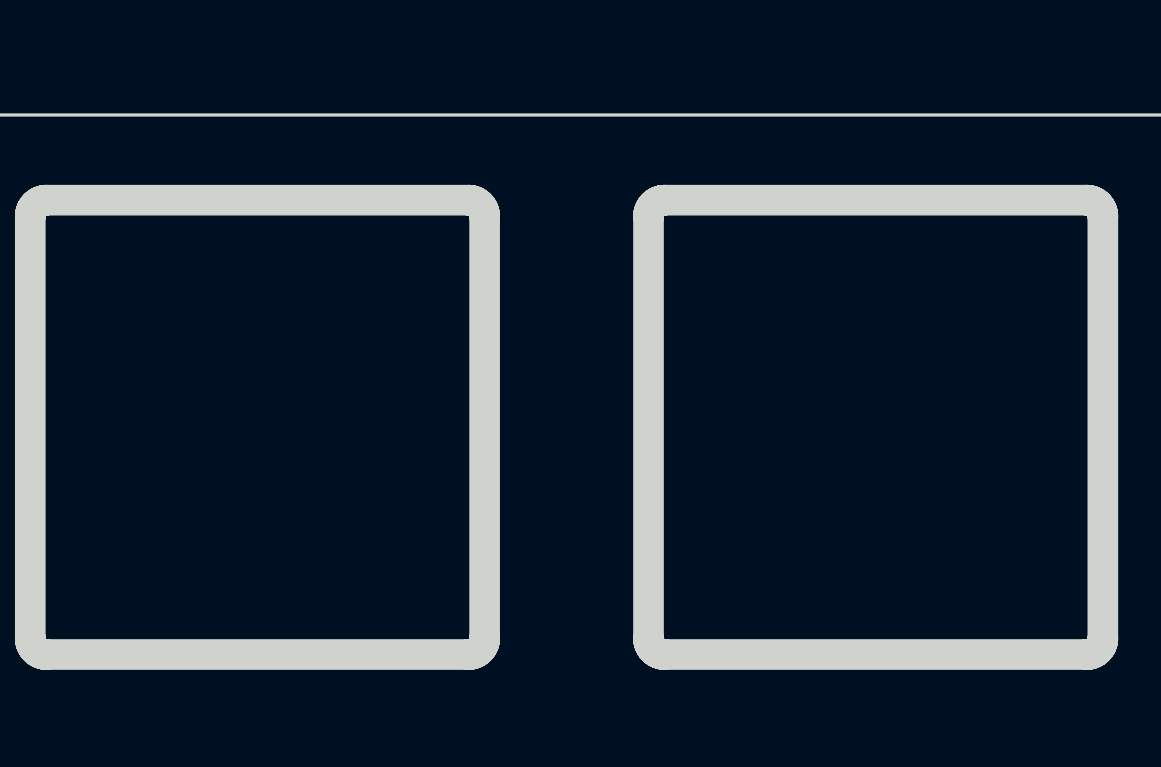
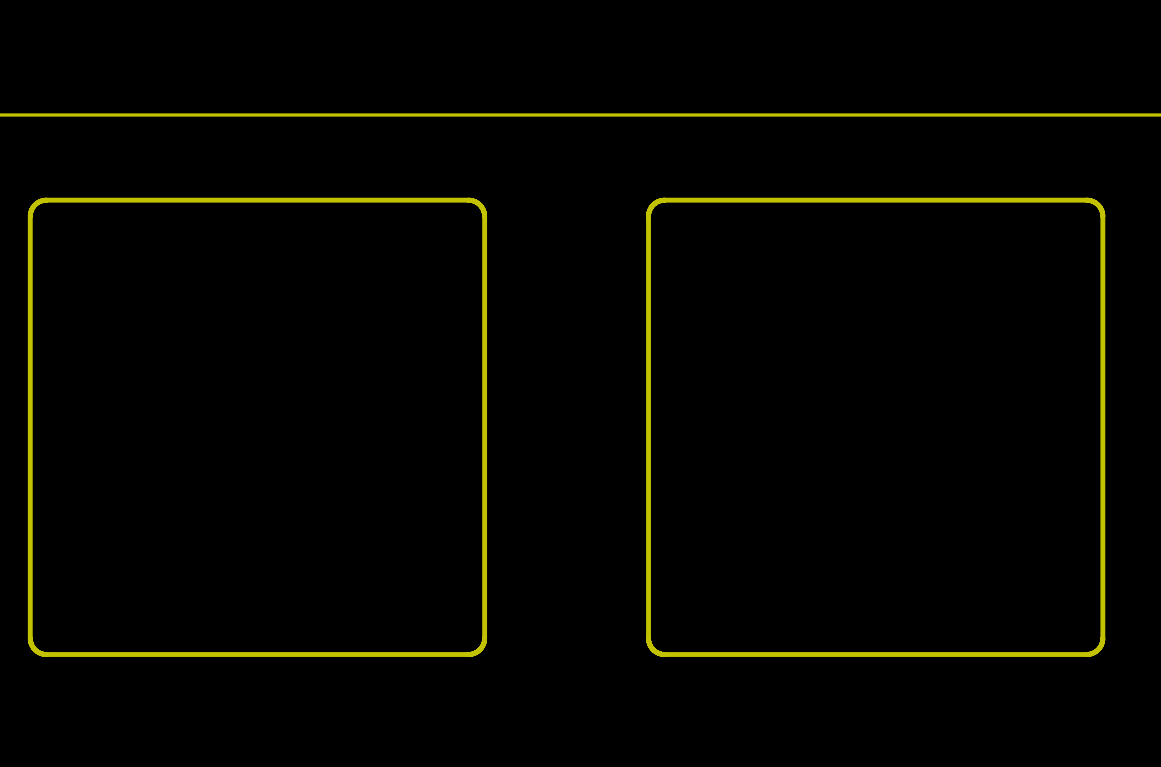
board edge width: thick (46, 200) (35, 204) (30, 215) (30, 638) (35, 649) (46, 654) (468, 654) (479, 649) (484, 638) (484, 216) (479, 204) (468, 200) (46, 200) -> thin (46, 200) (35, 204) (30, 215) (30, 638) (35, 649) (46, 654) (468, 654) (479, 649) (484, 638) (484, 216) (479, 204) (468, 200) (46, 200)
board edge width: thick (664, 200) (653, 204) (648, 215) (648, 638) (653, 649) (664, 654) (1086, 654) (1098, 649) (1102, 638) (1102, 216) (1098, 204) (1086, 200) (664, 200) -> thin (664, 200) (653, 204) (648, 215) (648, 638) (653, 649) (664, 654) (1086, 654) (1098, 649) (1102, 638) (1102, 216) (1098, 204) (1086, 200) (664, 200)

